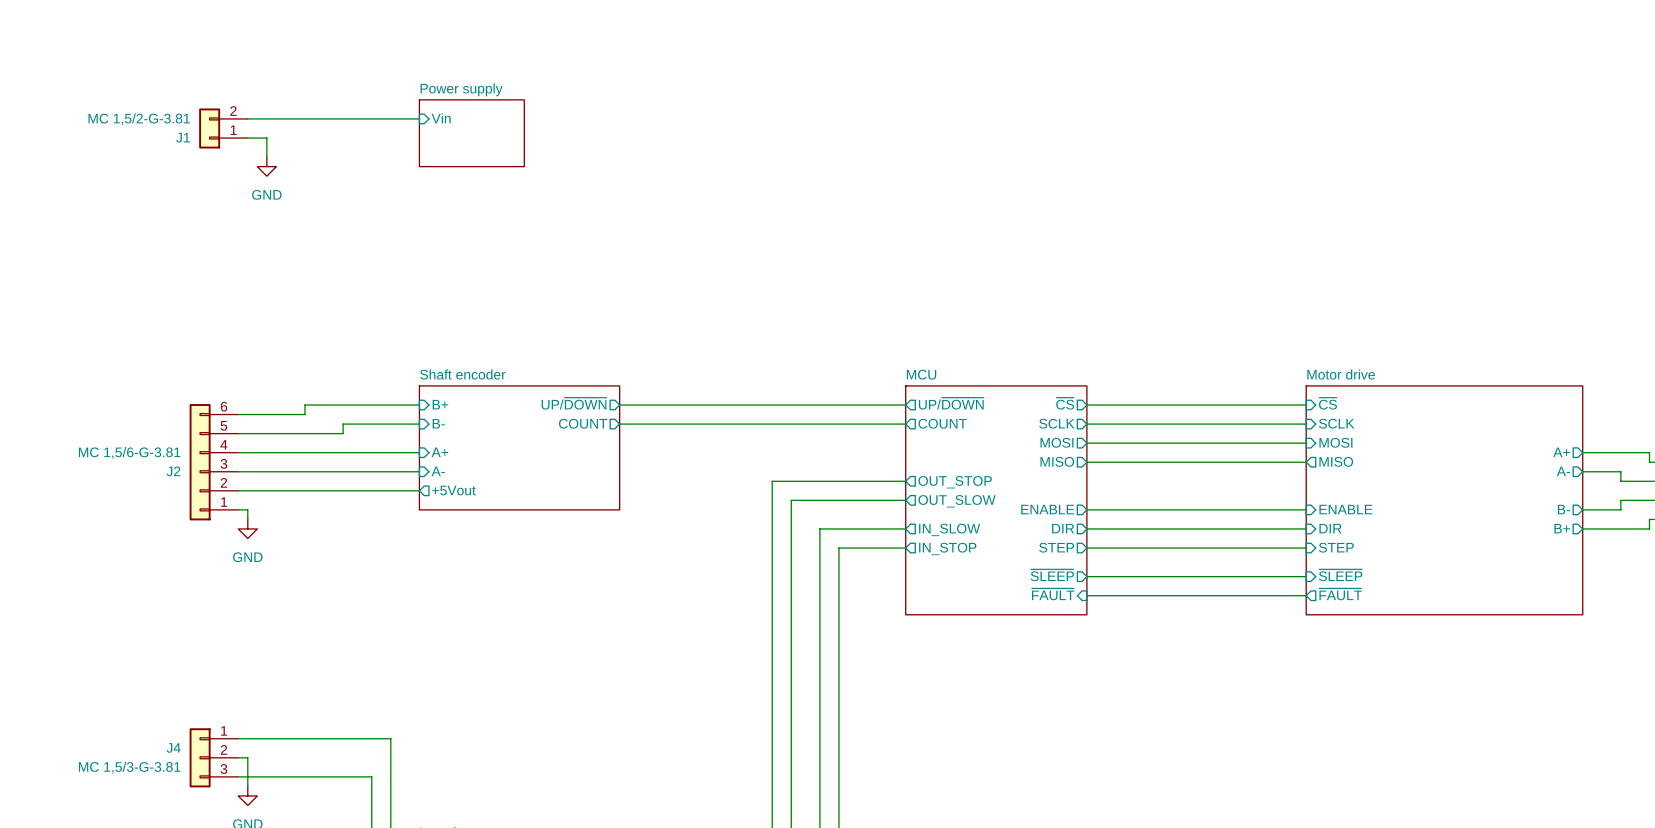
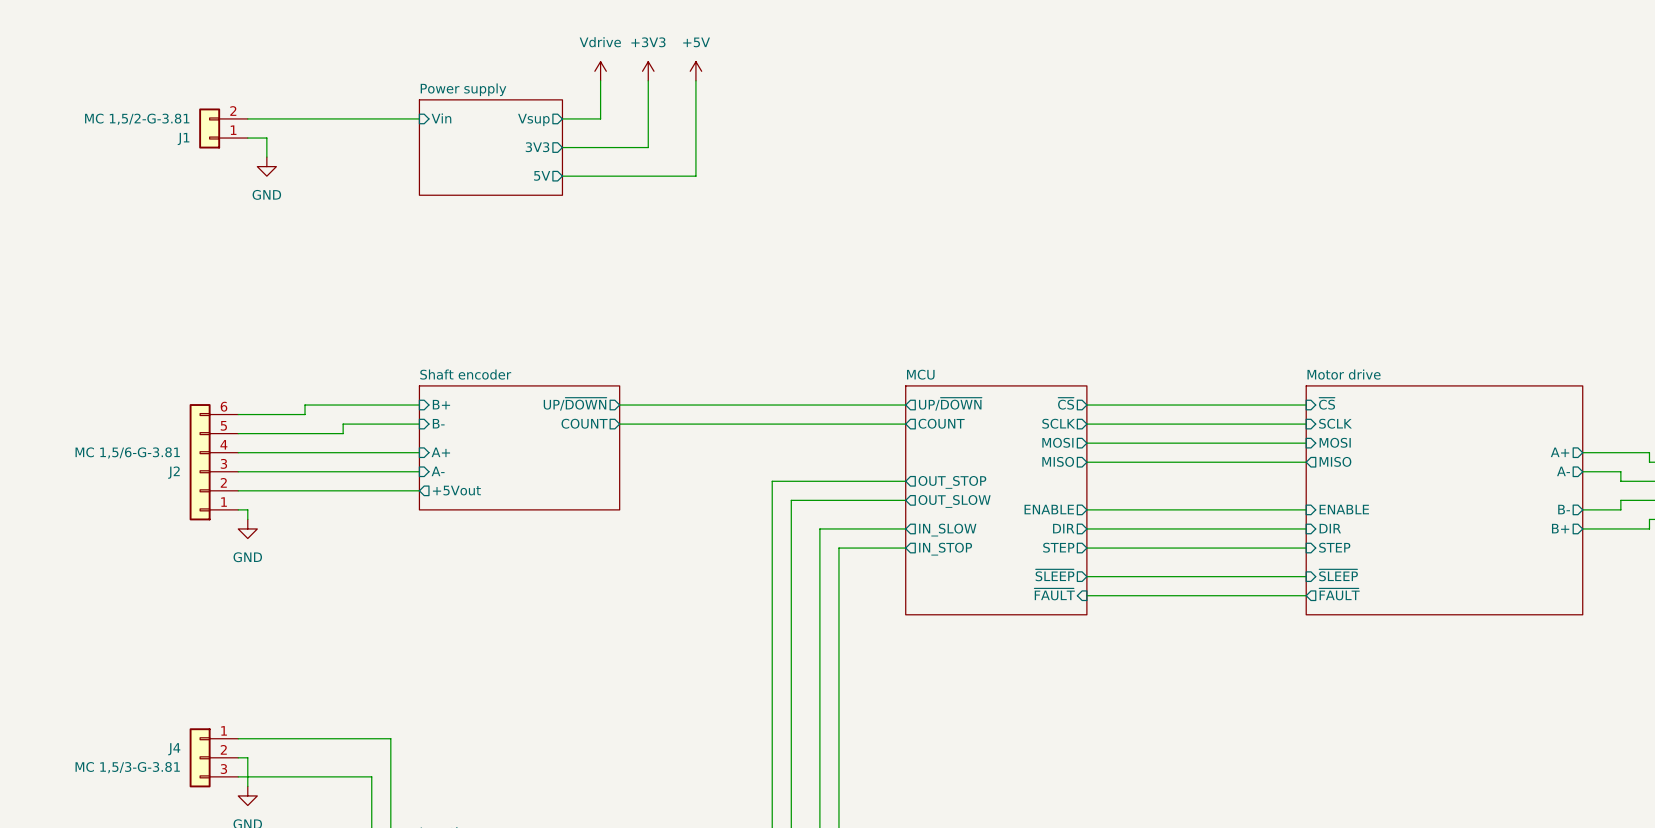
power symbol: none -> Vdrive (600, 71)
power symbol: none -> +3V3 (648, 71)
power symbol: none -> +5V (695, 71)
wire: none -> (600, 80) (600, 118) (562, 118)
wire: none -> (648, 80) (648, 147) (562, 147)
wire: none -> (695, 80) (695, 176) (562, 176)
sheet pin: none -> Vsup (533, 119)
sheet Power supply: (471, 133) -> none
sheet Power supply: none -> (490, 147)
sheet pin: none -> 3V3 (537, 147)
sheet pin: none -> 5V (542, 175)

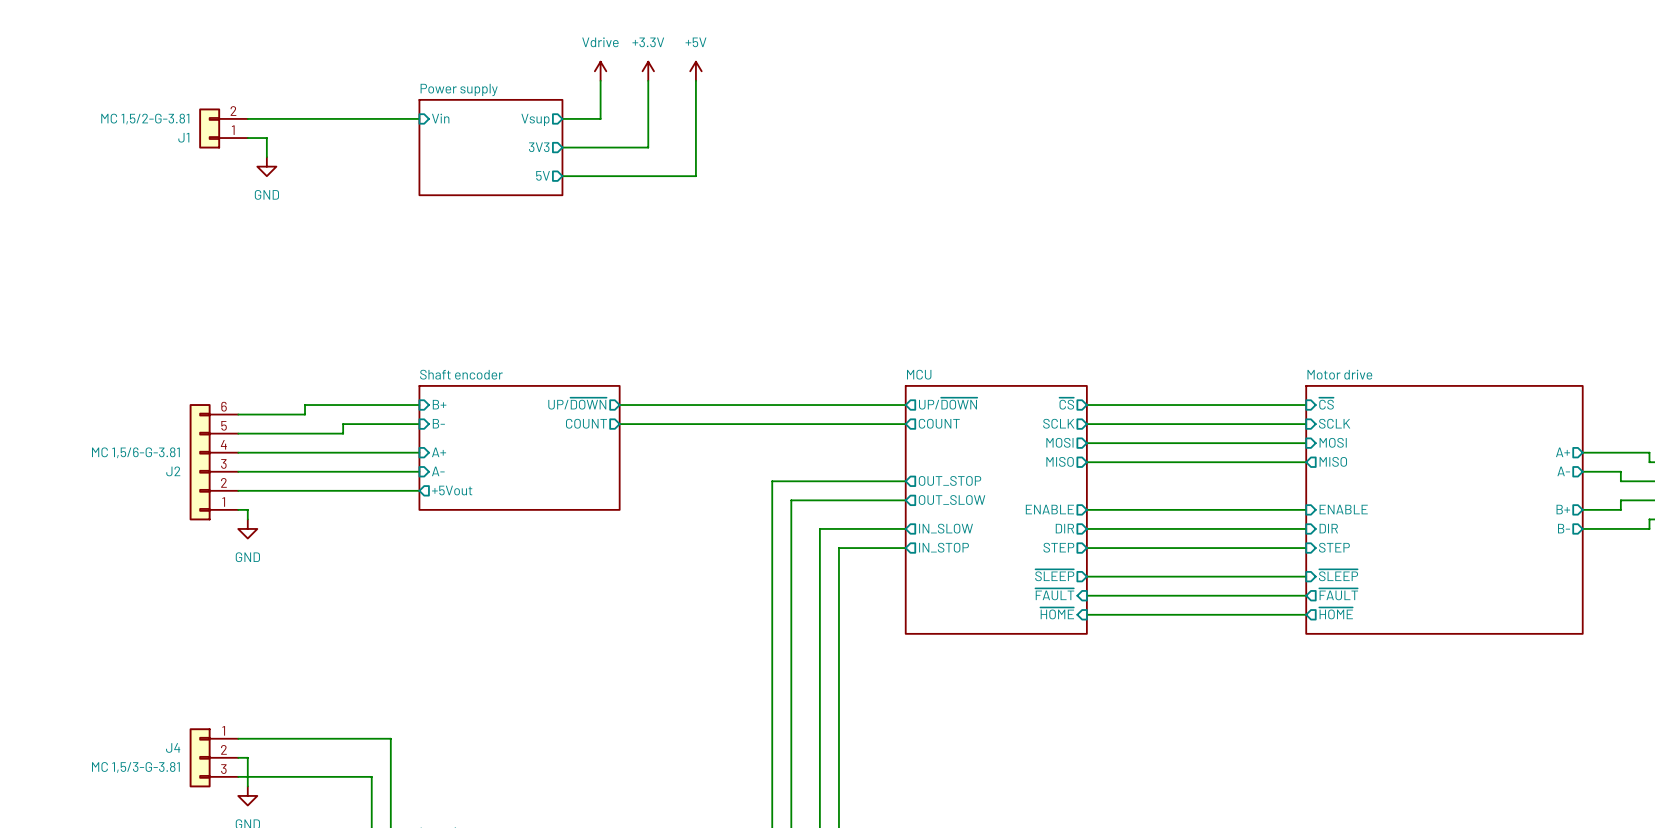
power symbol: +3V3 (648, 71) -> +3.3V (648, 71)
sheet MCU: (996, 500) -> none
sheet Motor drive: (1444, 500) -> none
sheet MCU: none -> (996, 509)
sheet Motor drive: none -> (1444, 509)
sheet pin: B- (1564, 509) -> B+ (1563, 509)
sheet pin: B+ (1560, 528) -> B- (1564, 528)
sheet pin: none -> ~{HOME} (1057, 613)
sheet pin: none -> ~{HOME} (1336, 613)
wire: none -> (1086, 614) (1306, 614)

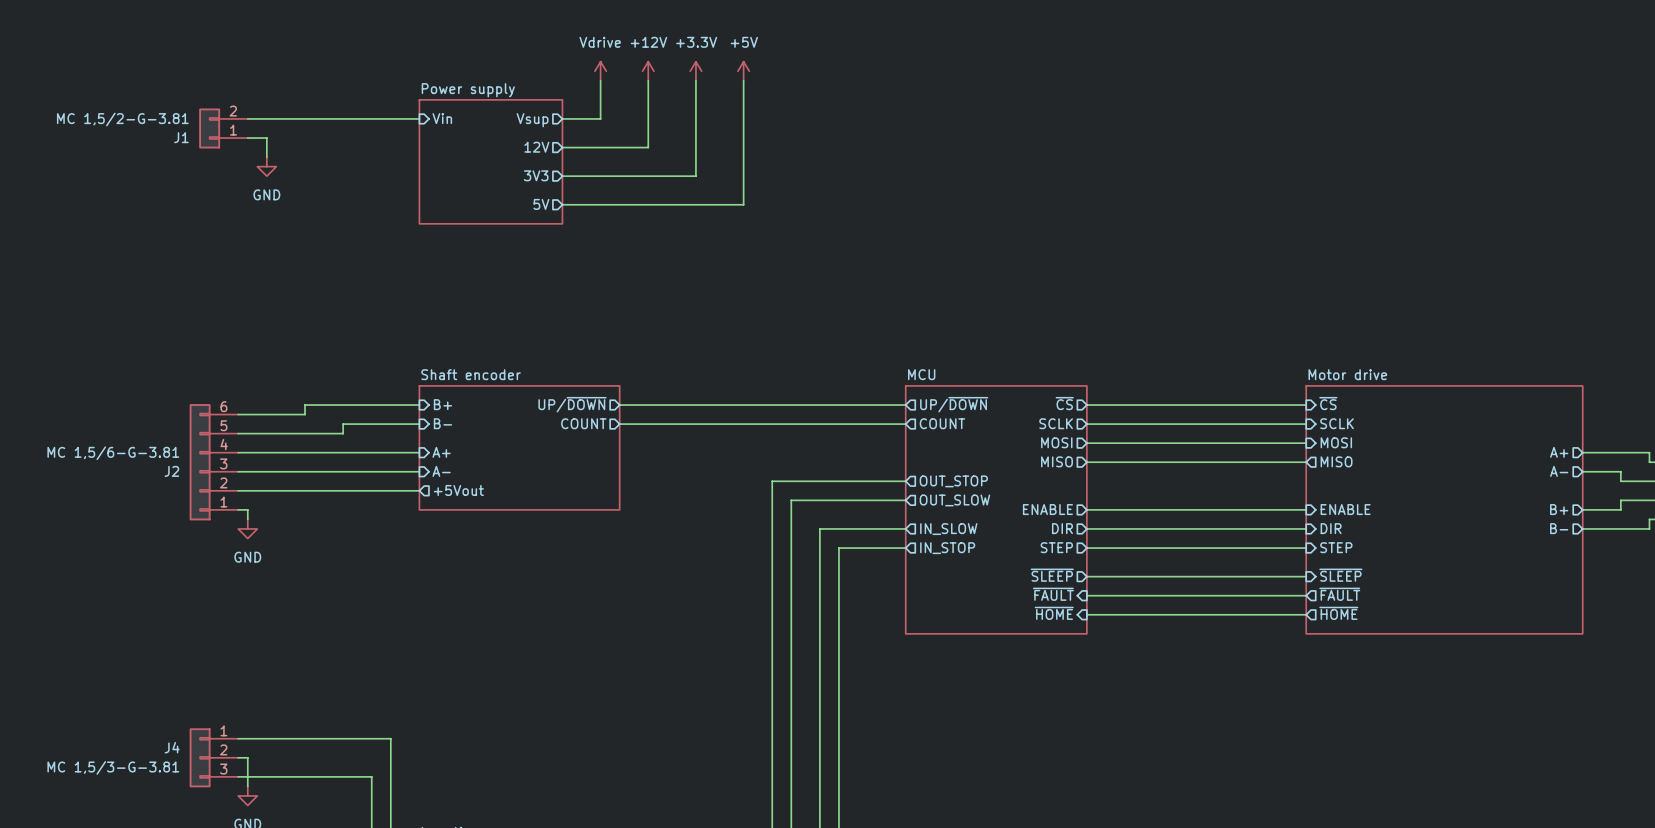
power symbol: +3.3V (648, 71) -> +12V (648, 71)
power symbol: +5V (695, 71) -> +3.3V (695, 71)
power symbol: none -> +5V (743, 71)
wire: none -> (743, 80) (743, 204) (562, 204)
sheet Power supply: (490, 147) -> none
sheet pin: 3V3 (539, 147) -> 12V (536, 147)
sheet Power supply: none -> (490, 161)
sheet pin: 5V (543, 175) -> 3V3 (536, 175)
sheet pin: none -> 5V (541, 204)

